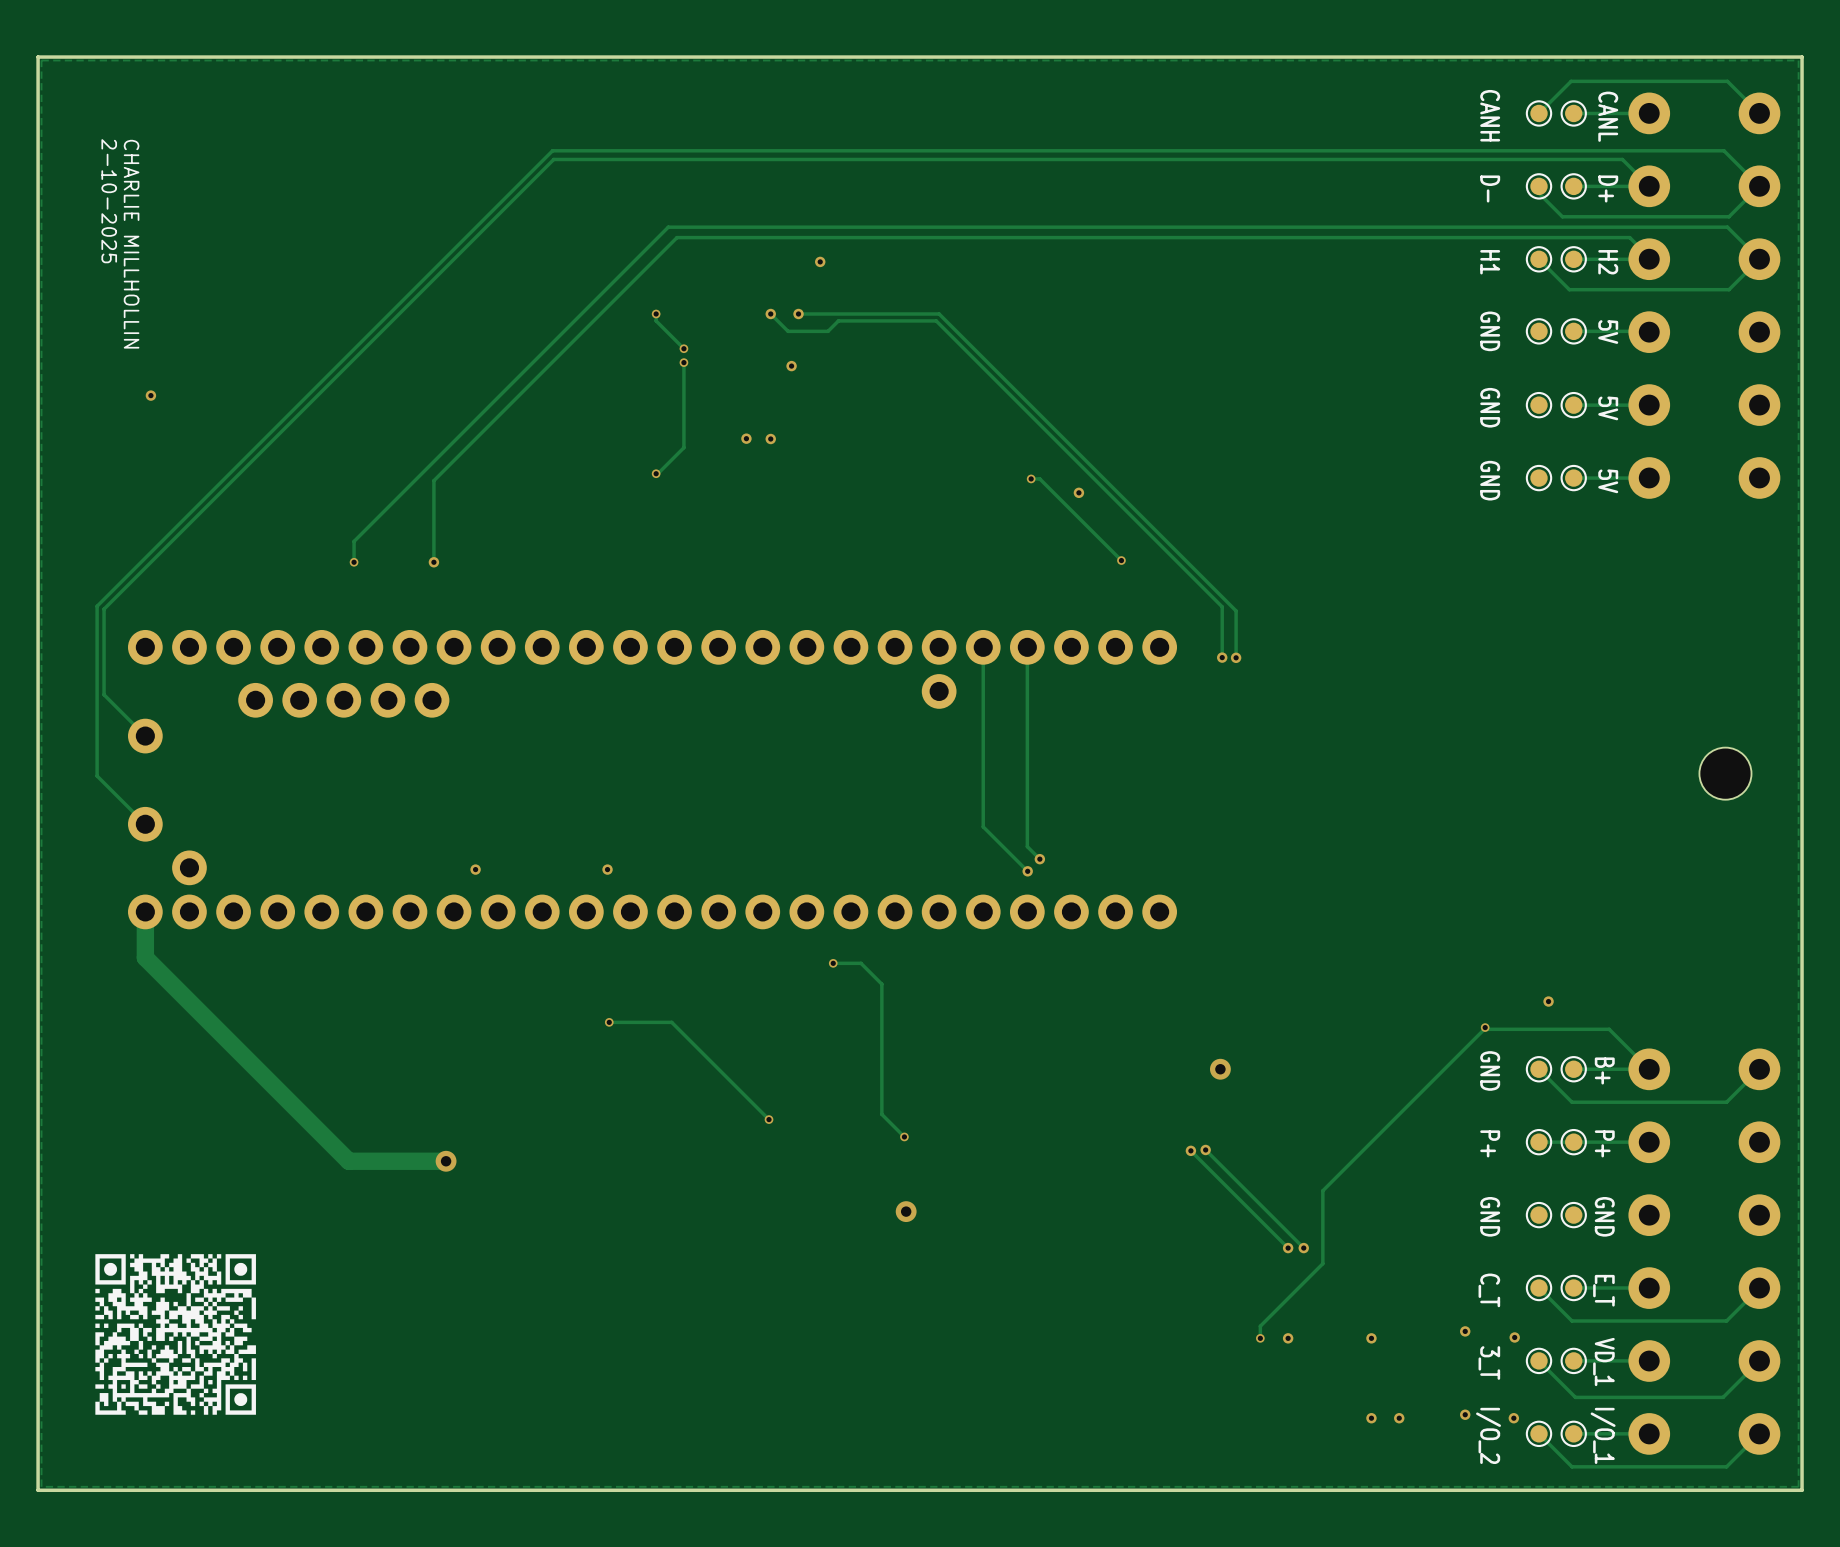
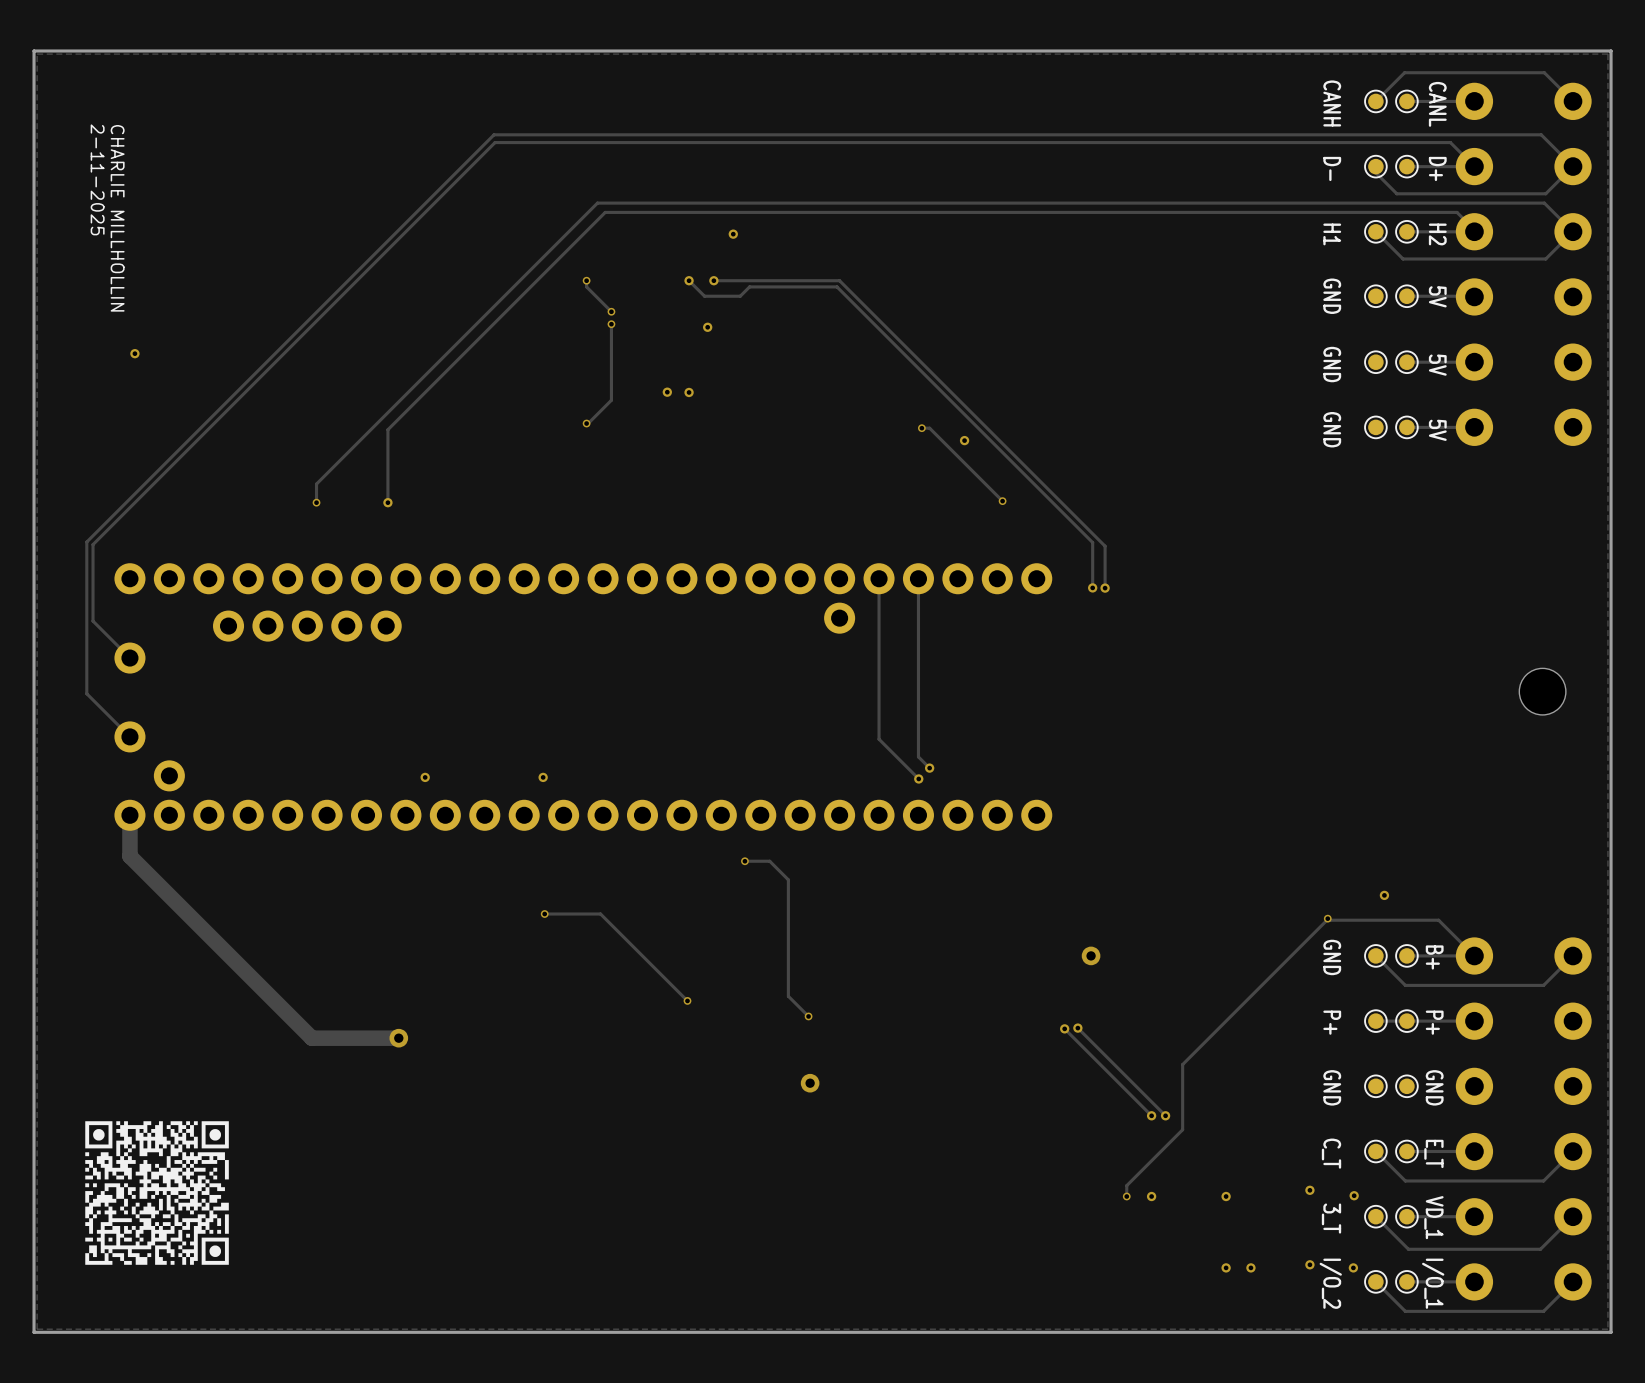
text: 2-10-2025 (109, 201) -> 2-11-2025 (97, 179)

